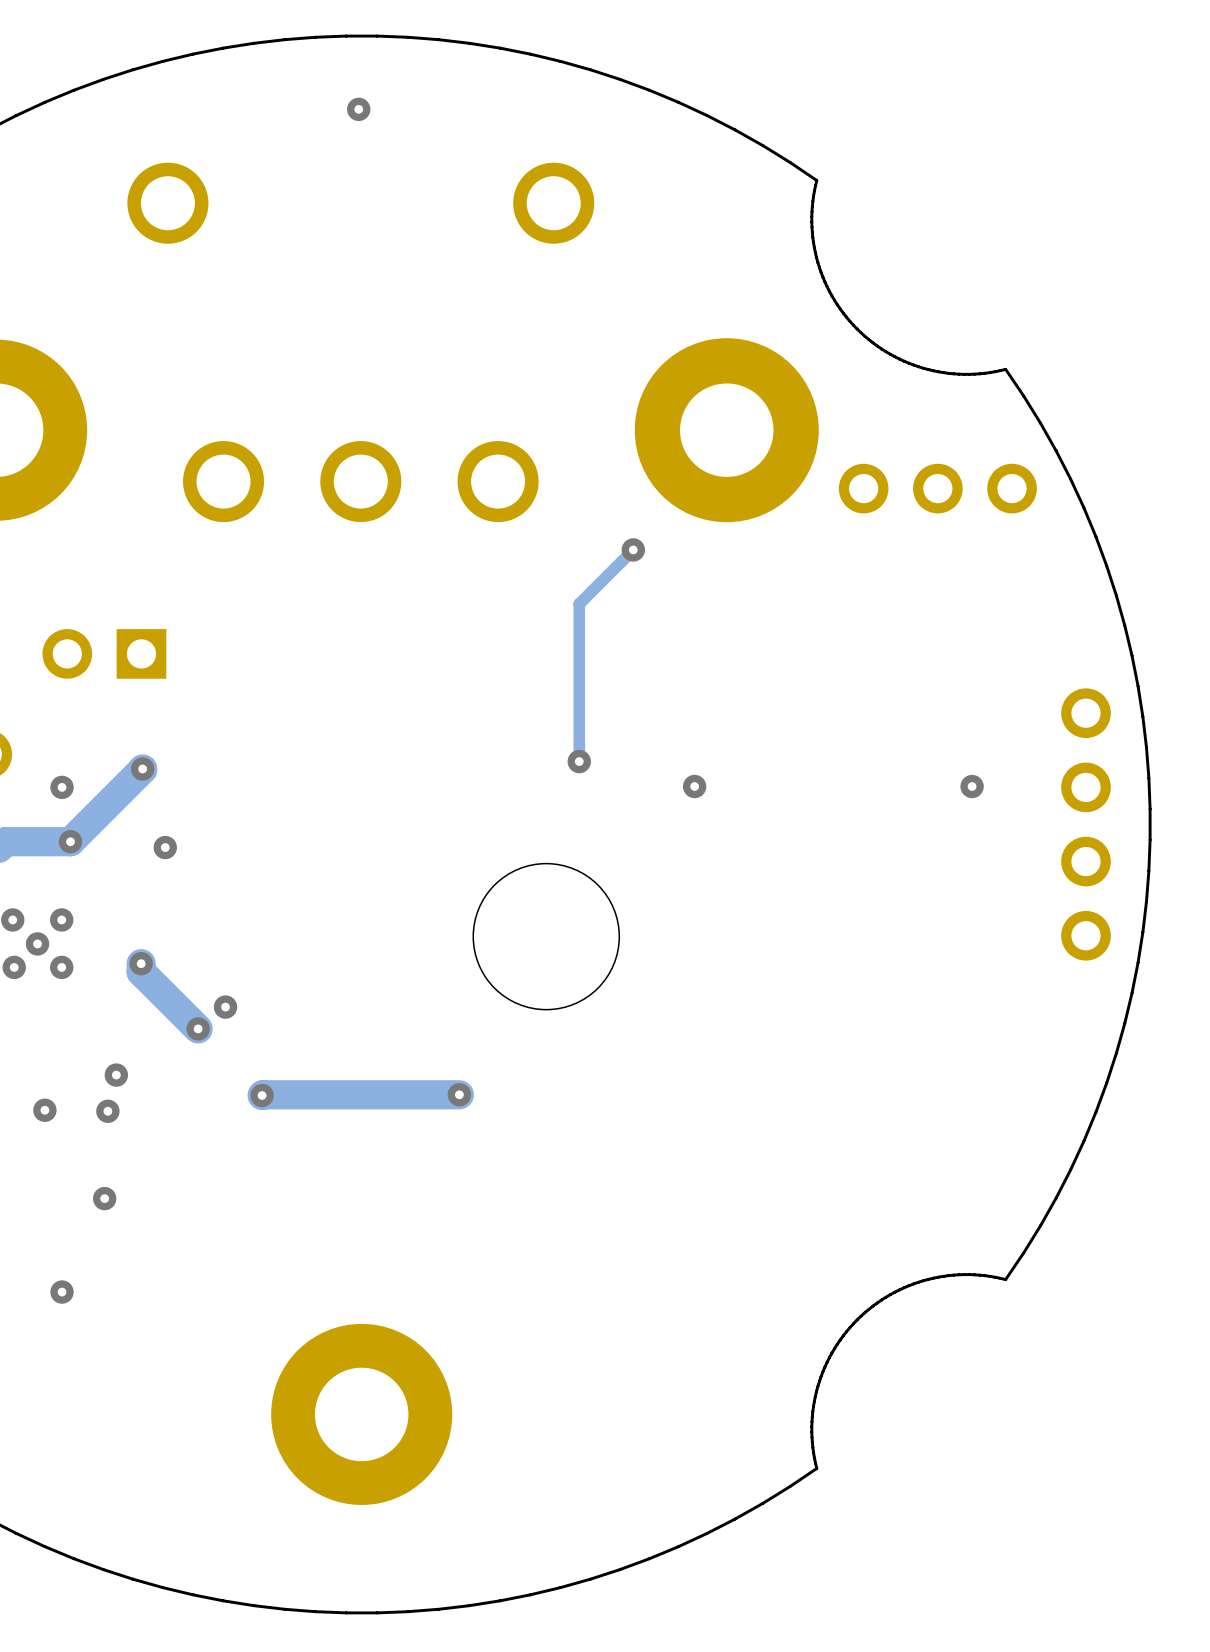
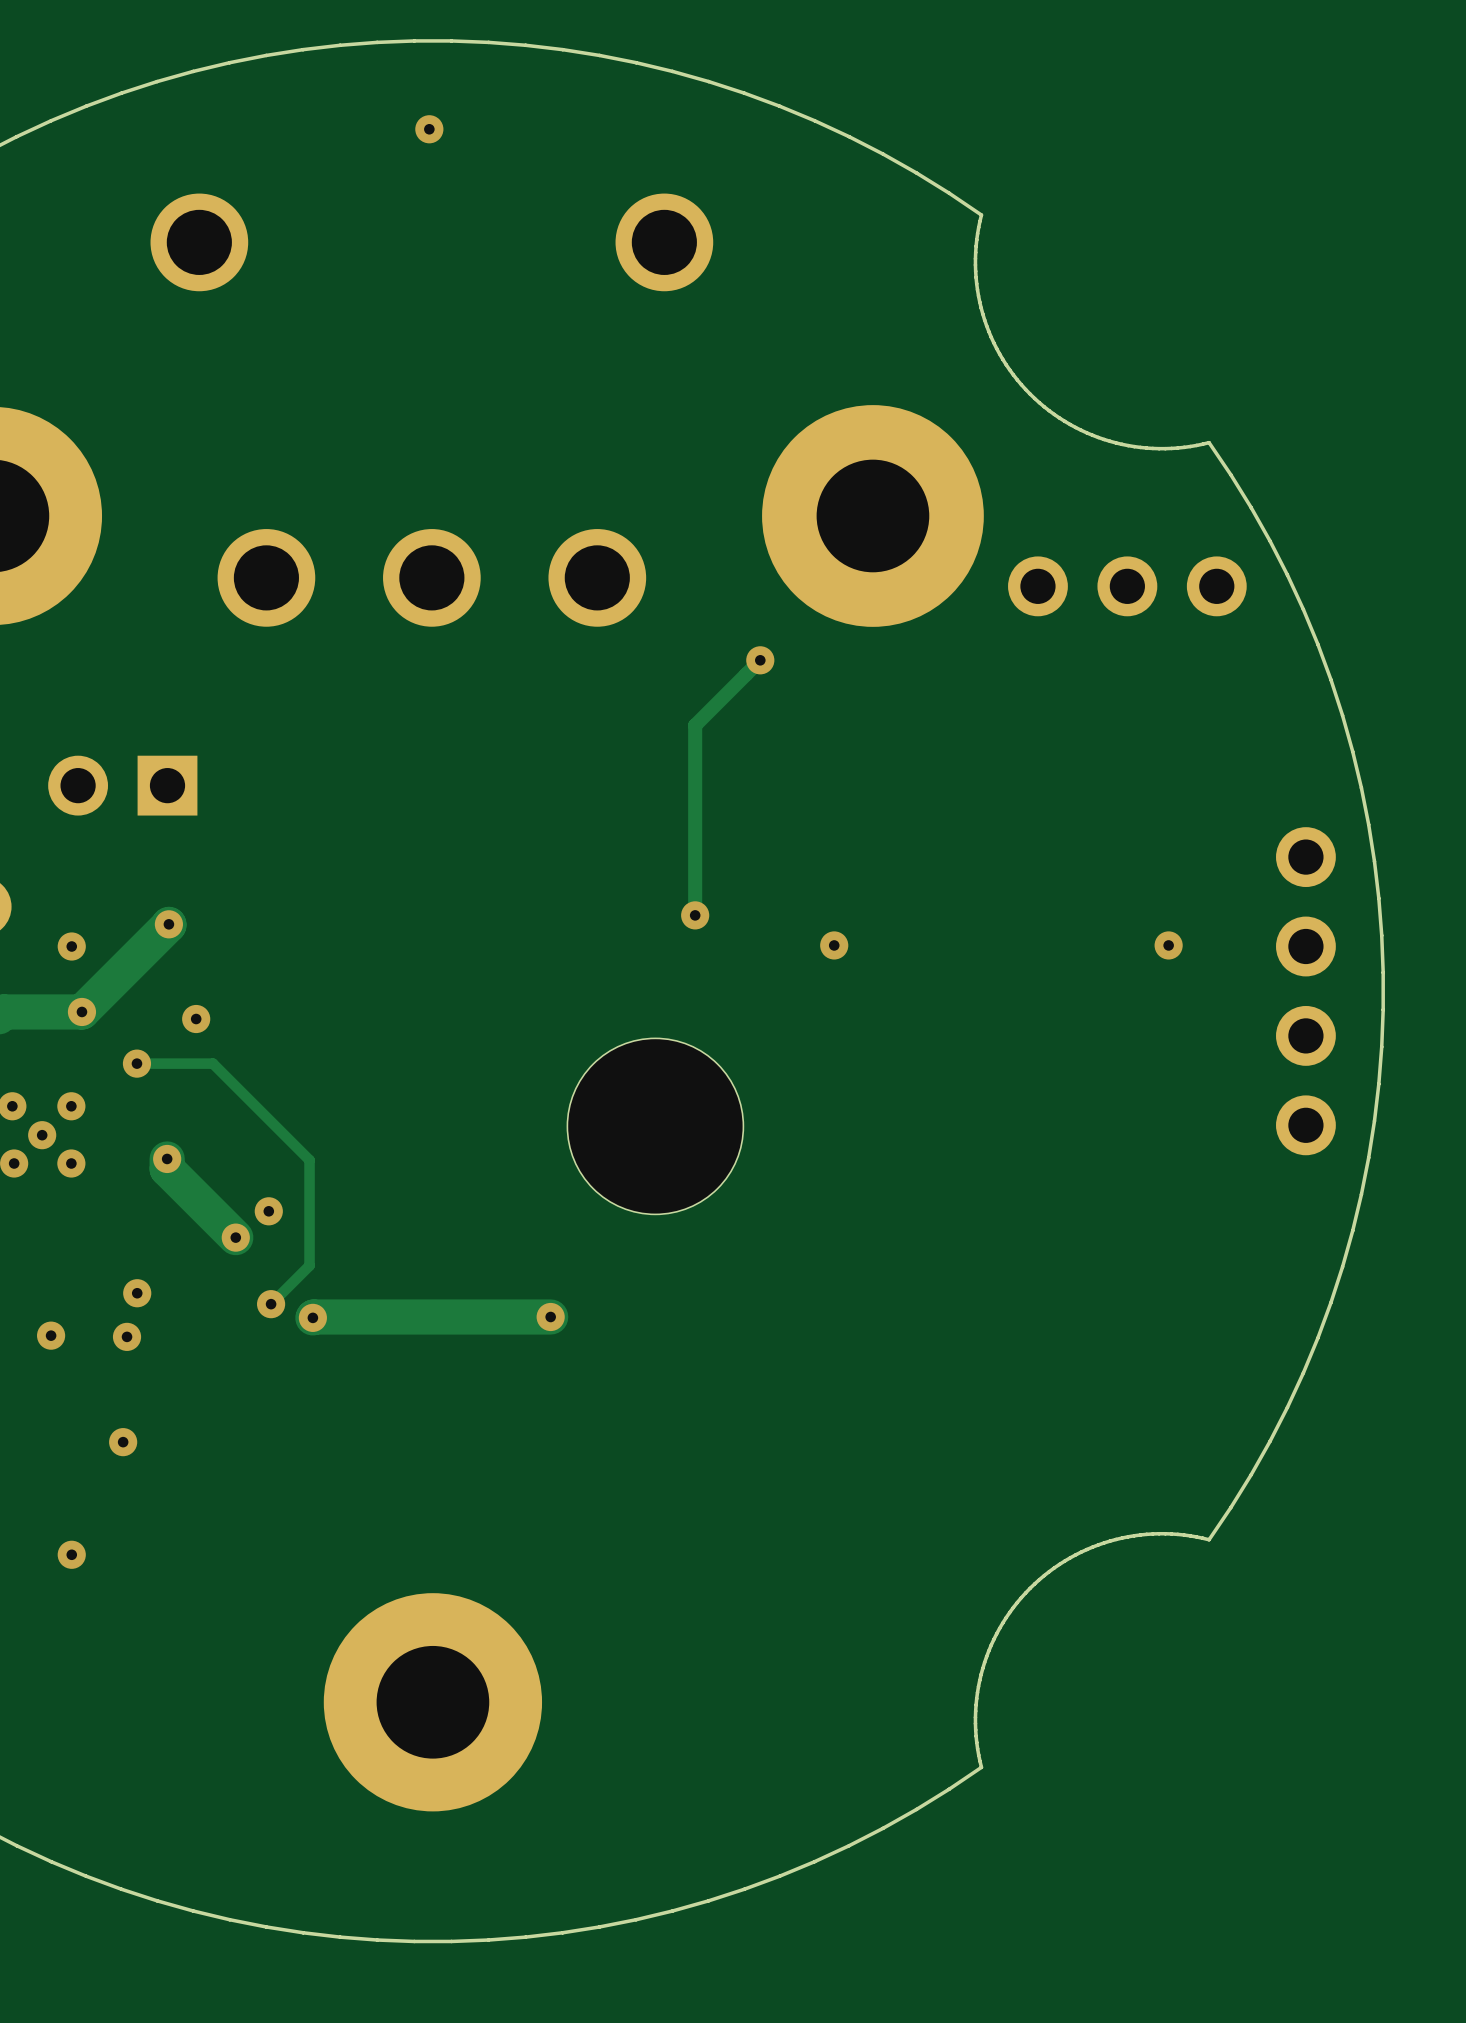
track: none -> (136, 1063) (212, 1063) (309, 1160) (309, 1265) (271, 1304)
via: none -> (136, 1063)
via: none -> (271, 1304)

